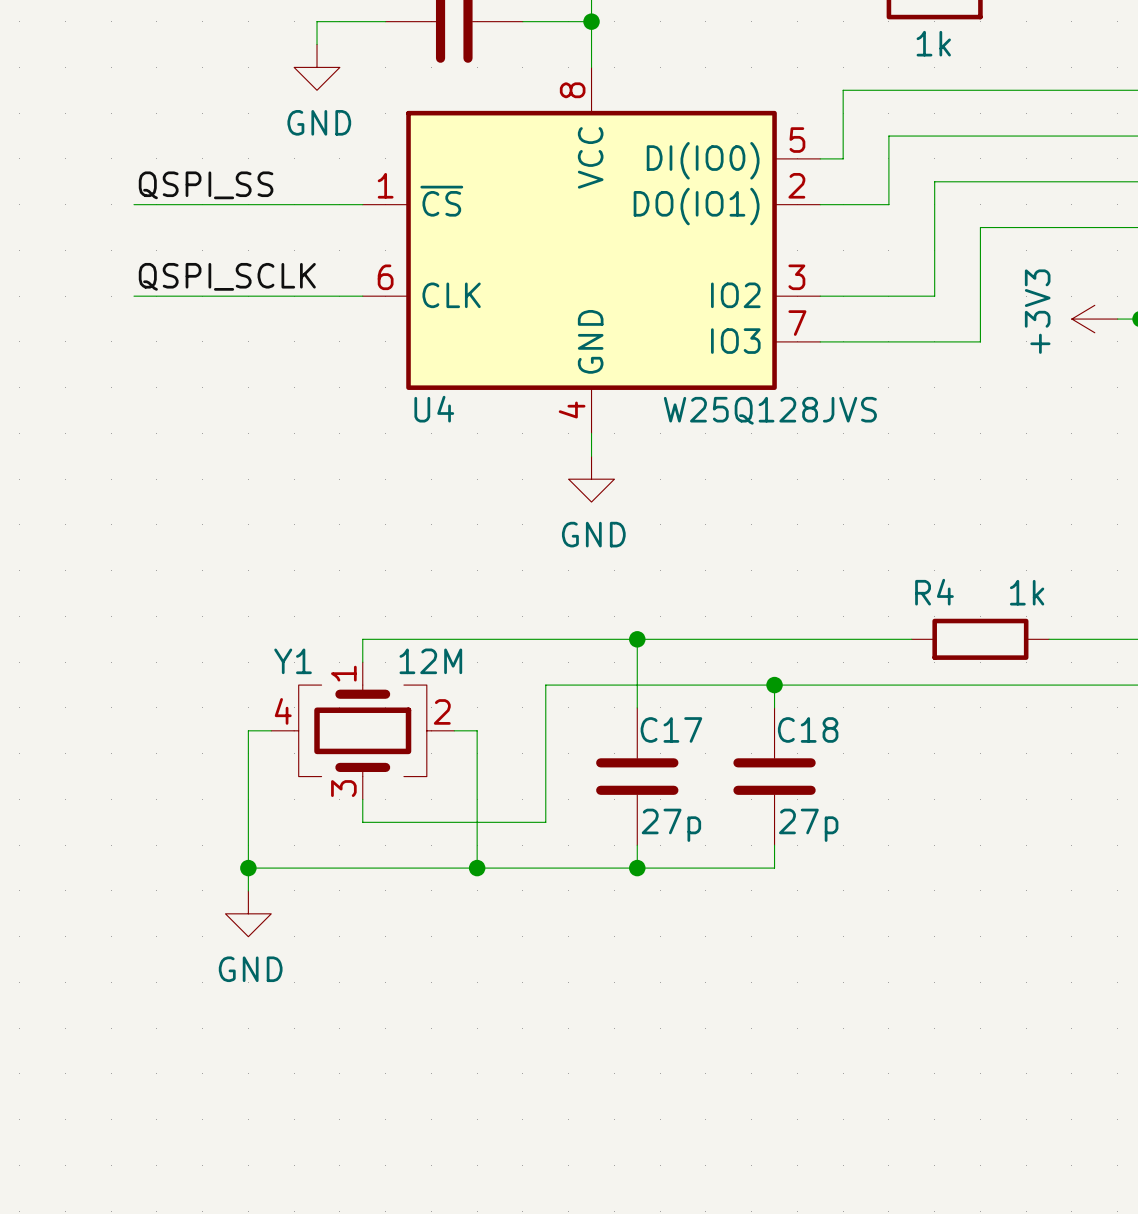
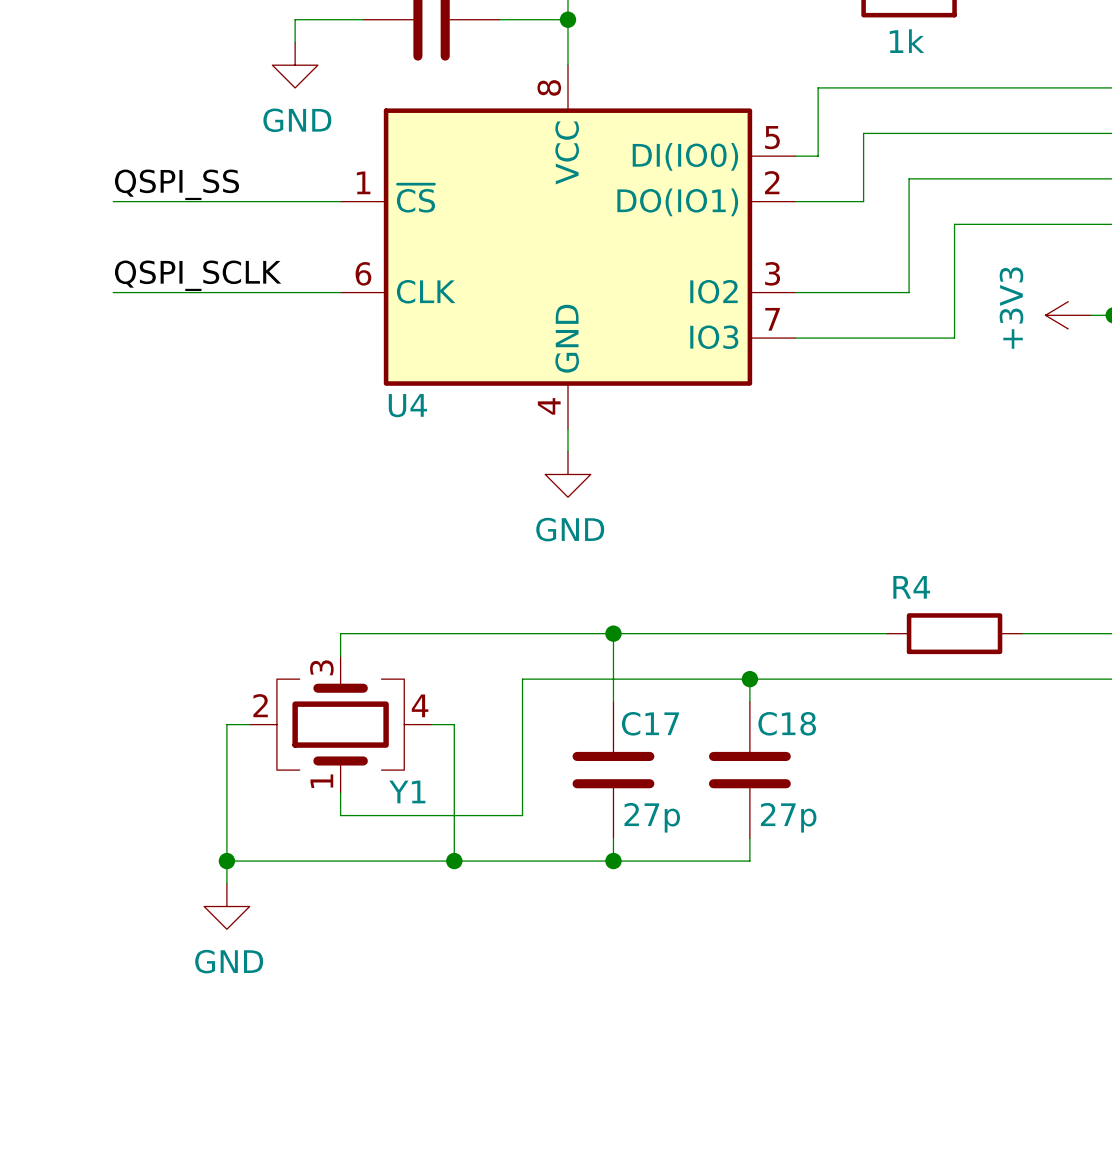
U4 value: W25Q128JVS (770, 410) -> none
R4 value: 1k (1027, 592) -> none
Y1 value: 12M (430, 661) -> none
Y1 rotation: 0° (362, 730) -> 180° (340, 724)

